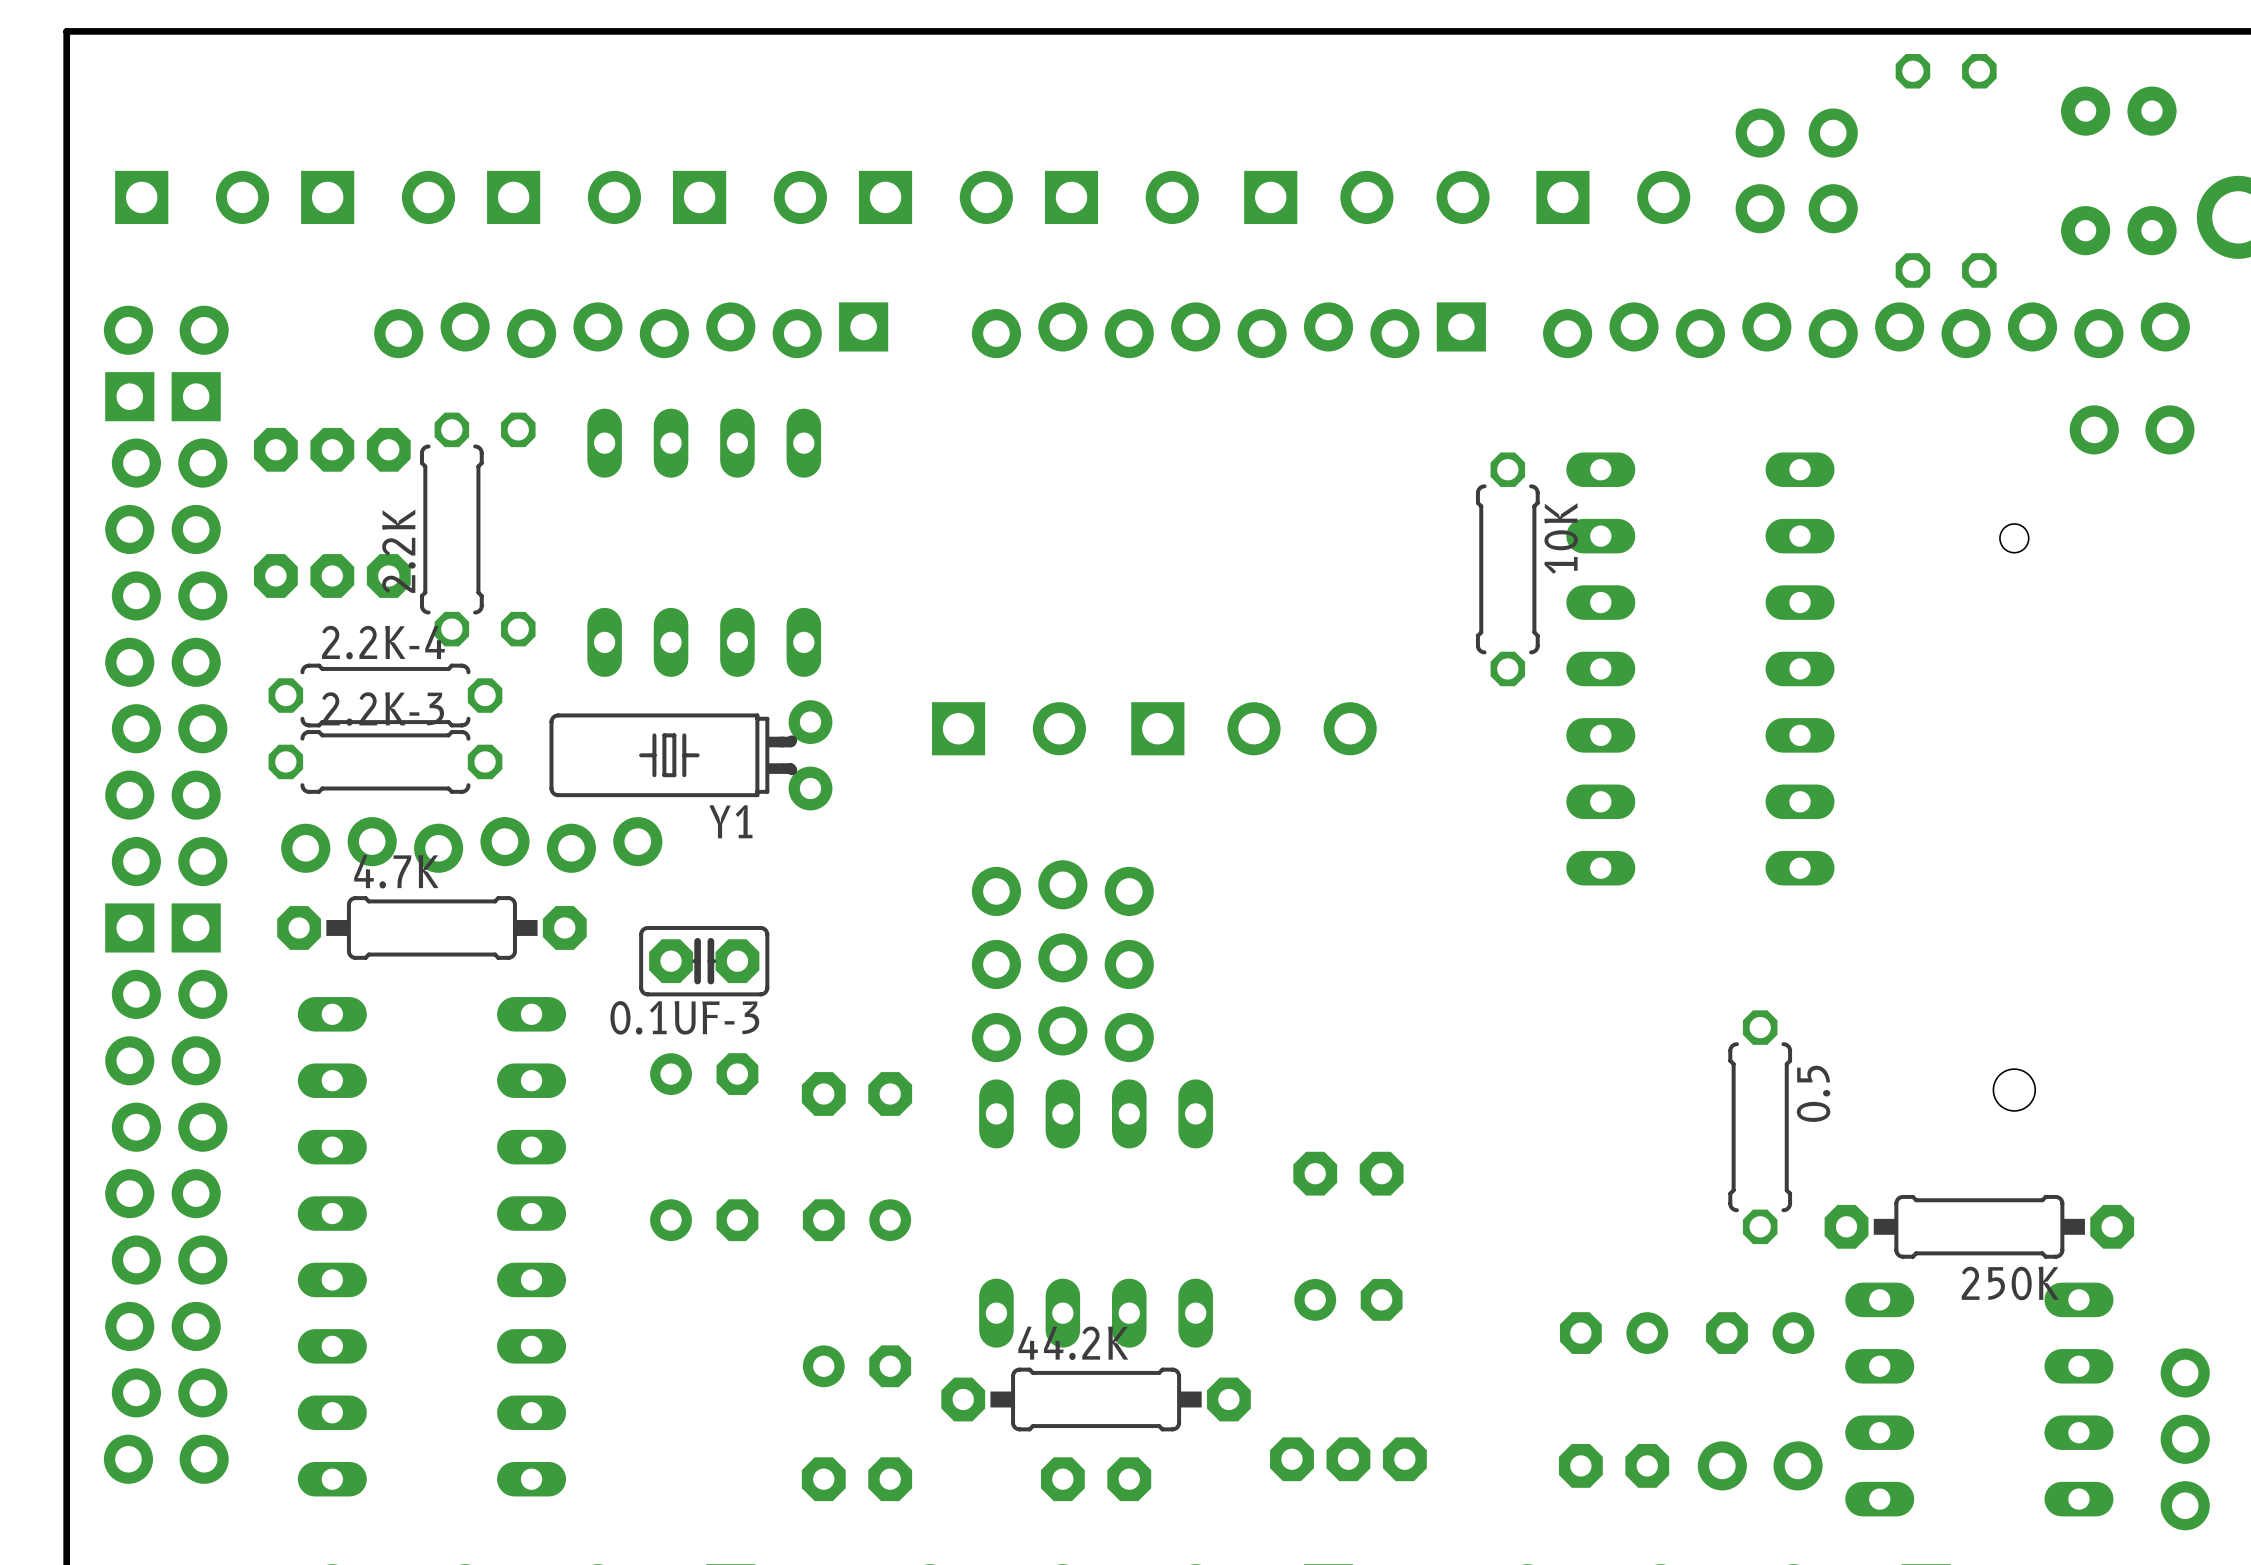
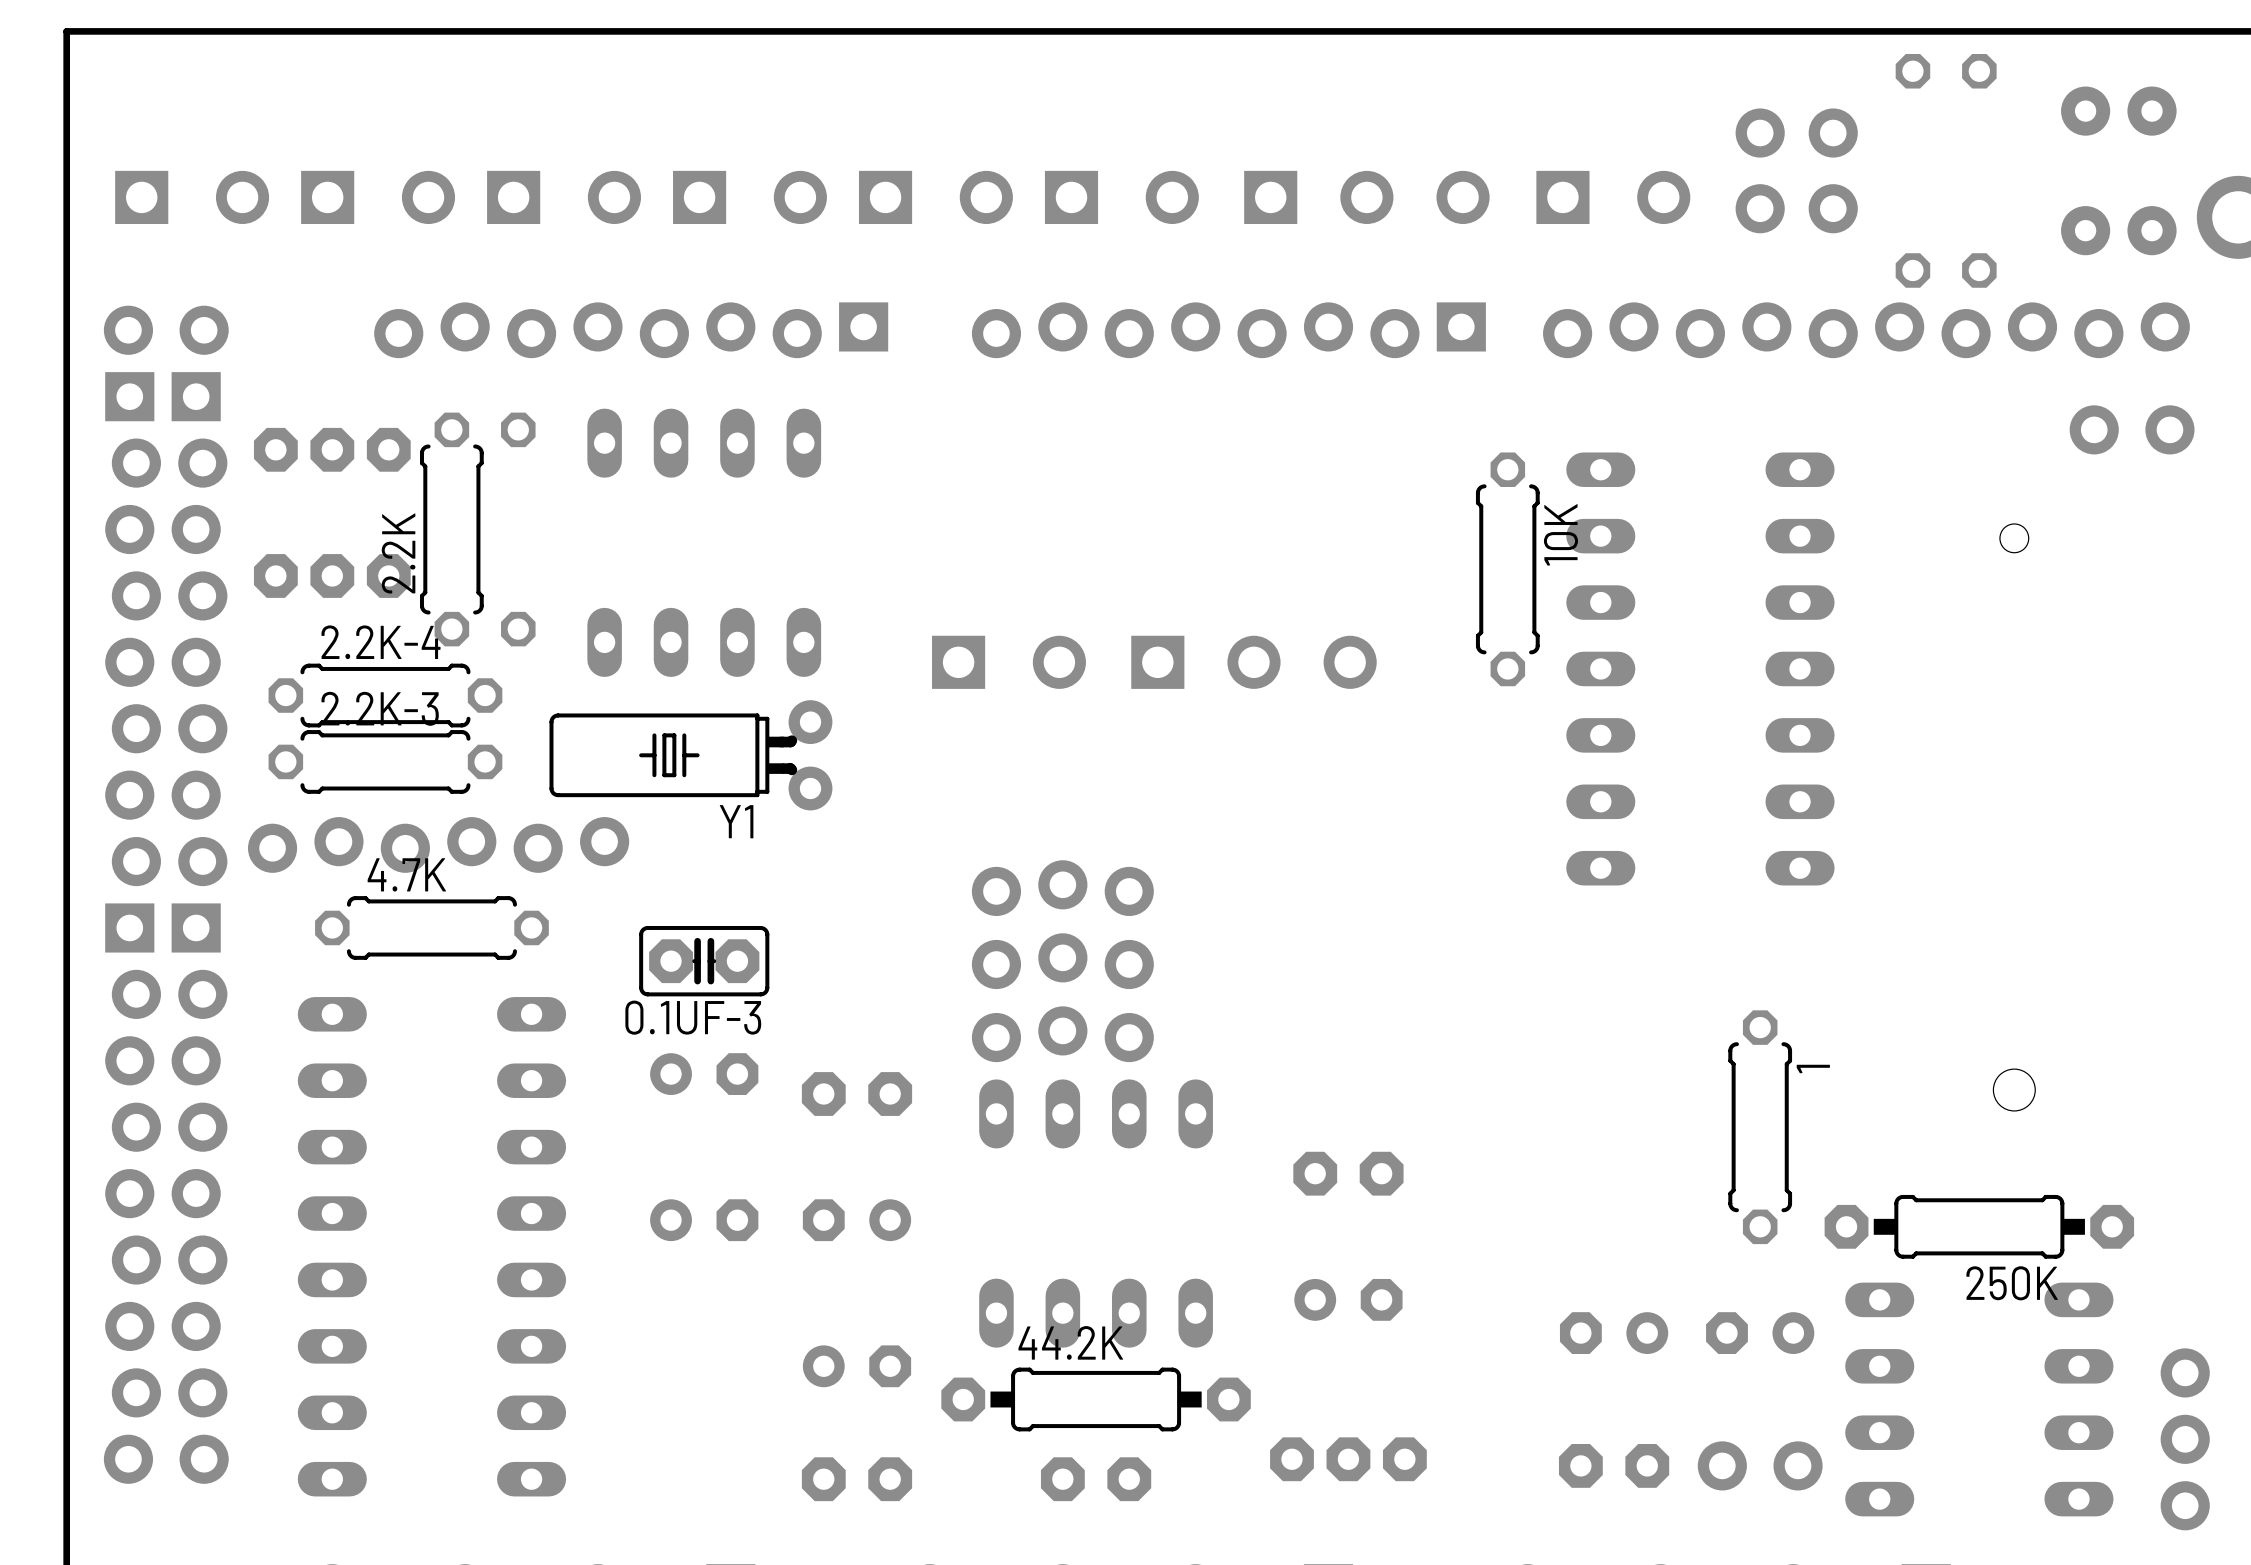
part position: (1009, 728) -> (1009, 662)
part position: (1253, 728) -> (1253, 662)
part position: (471, 844) -> (438, 844)
4.7K footprint: [277, 896, 587, 960] -> [315, 896, 549, 960]
0.5 name: 0.5 (1813, 1093) -> 1 (1813, 1069)

